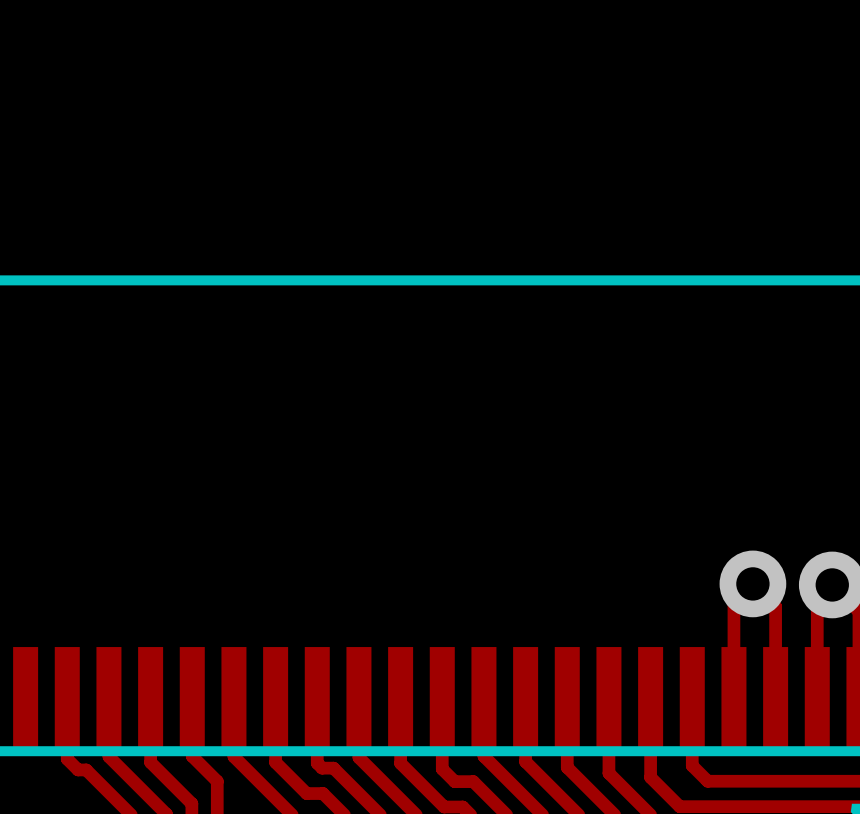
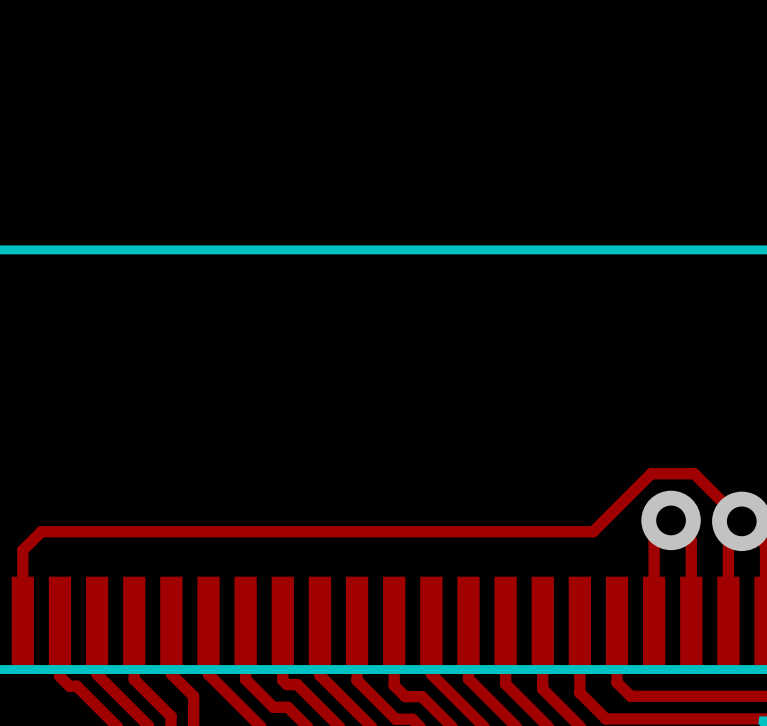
track: none -> (741, 521) (694, 473) (651, 473) (593, 531) (41, 531) (22, 550) (22, 623)

